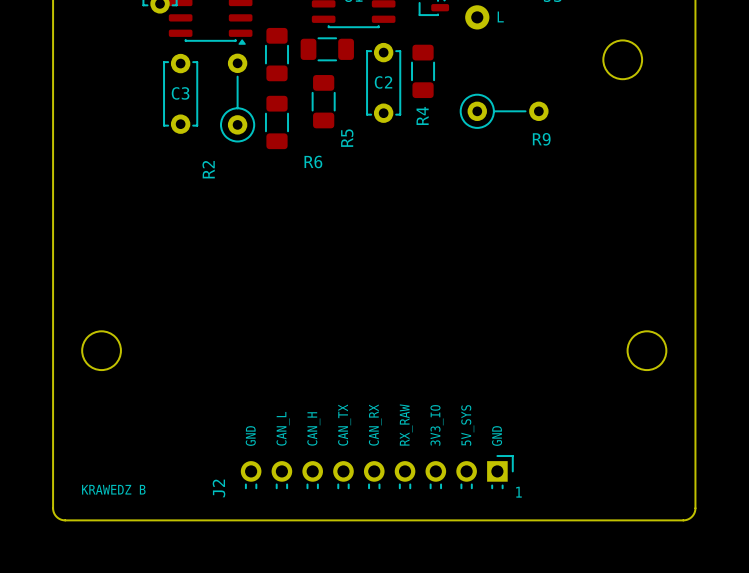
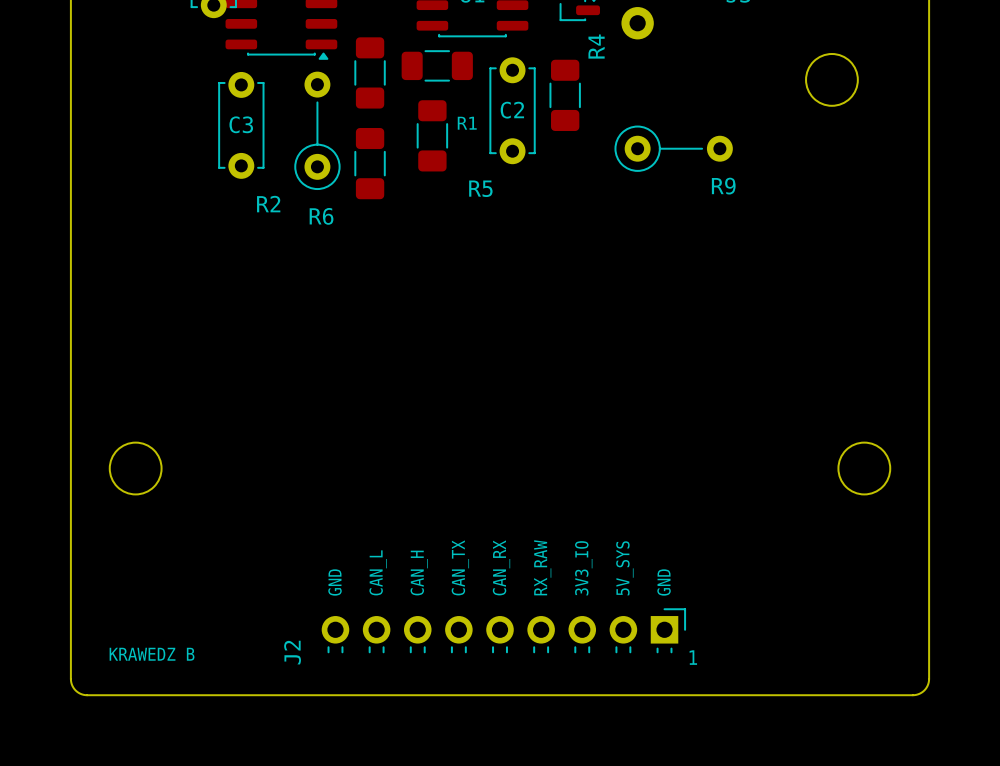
text: L (500, 16) -> none
R1 name: none -> R1 (467, 123)
R4 name position: R4 (422, 115) -> R4 (596, 46)
R5 name rotation: 0° (347, 138) -> 90° clockwise (480, 188)
R6 name position: R6 (313, 161) -> R6 (321, 216)
R2 name rotation: 0° (208, 169) -> 90° clockwise (268, 204)

